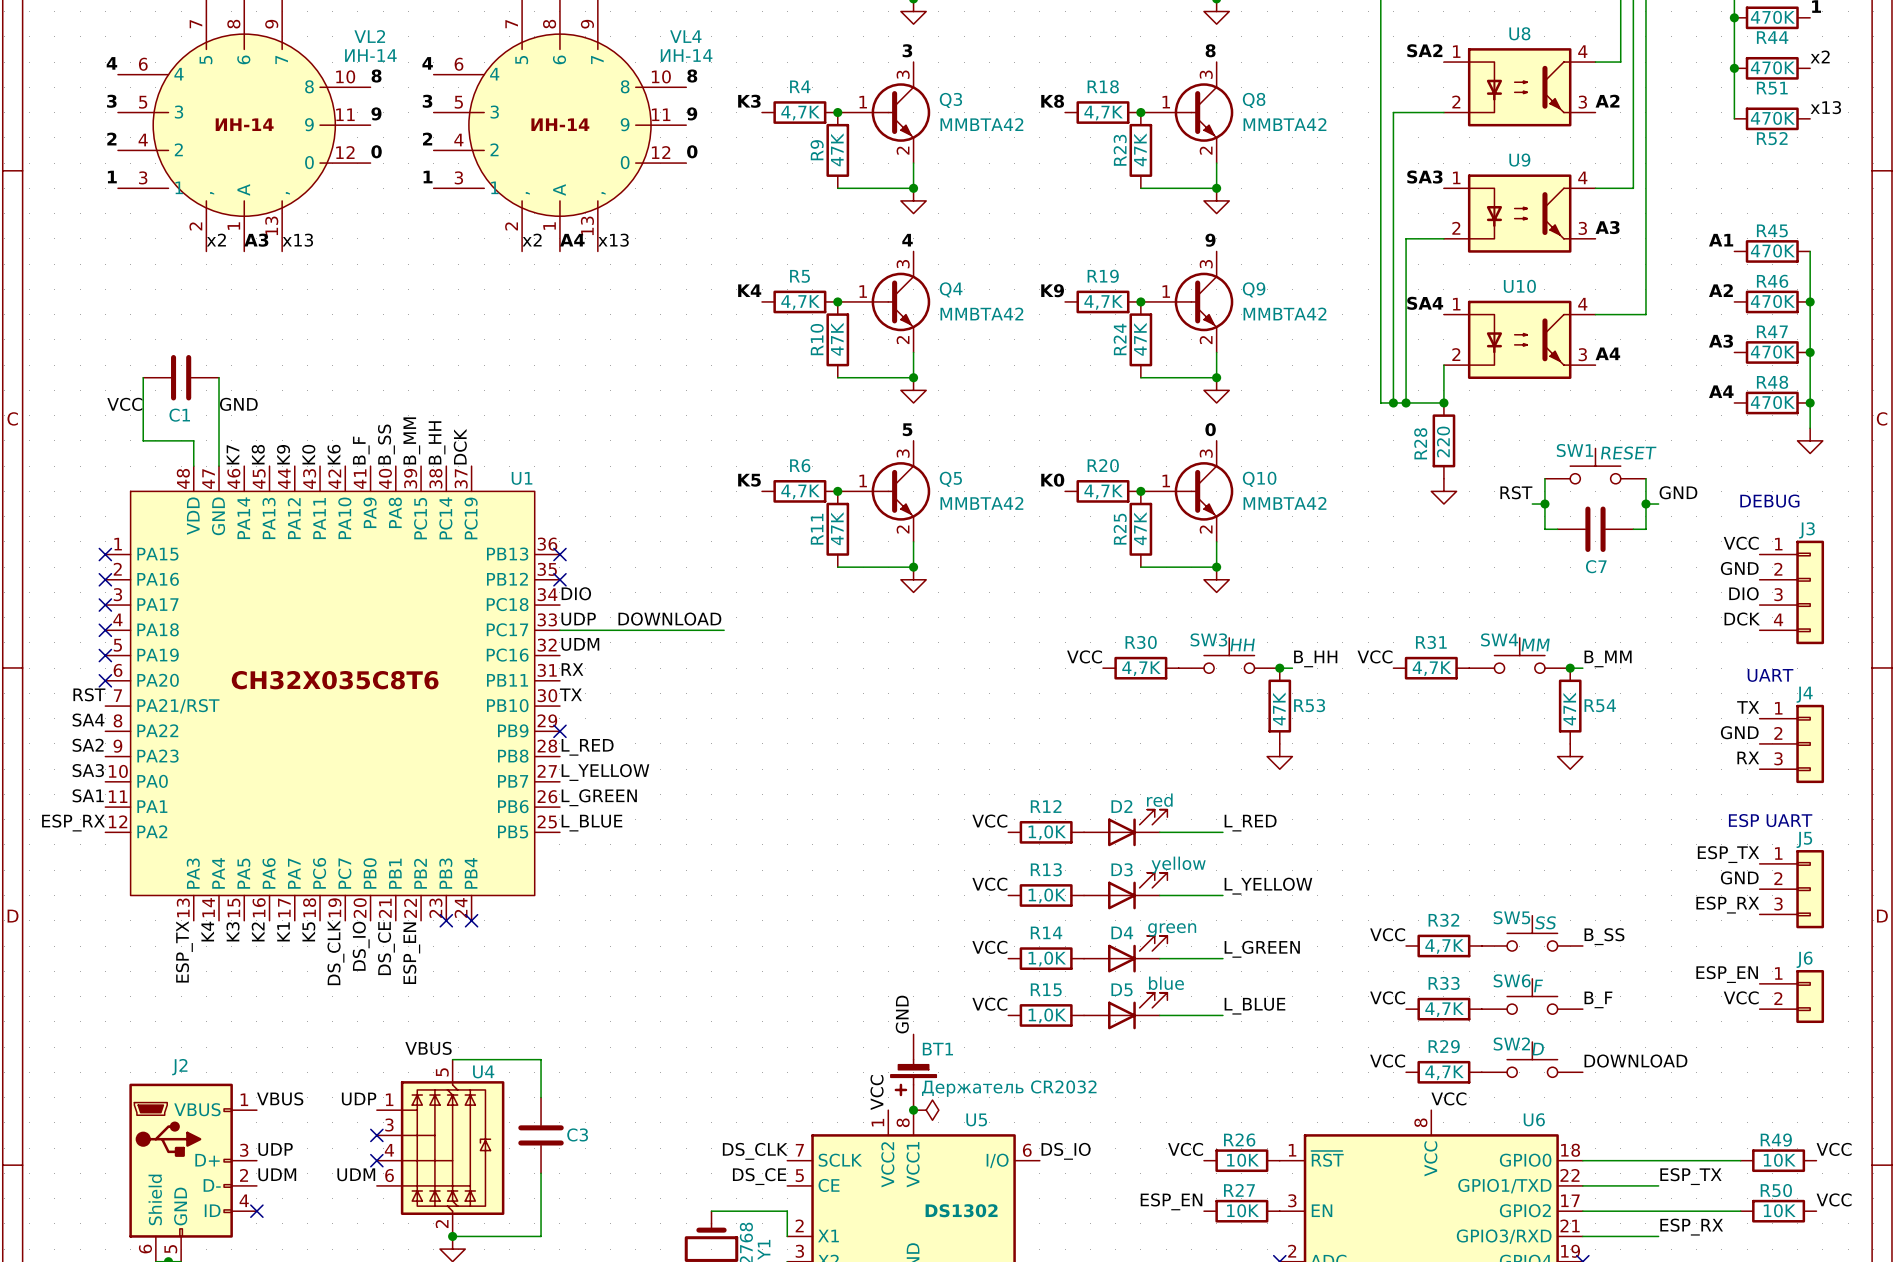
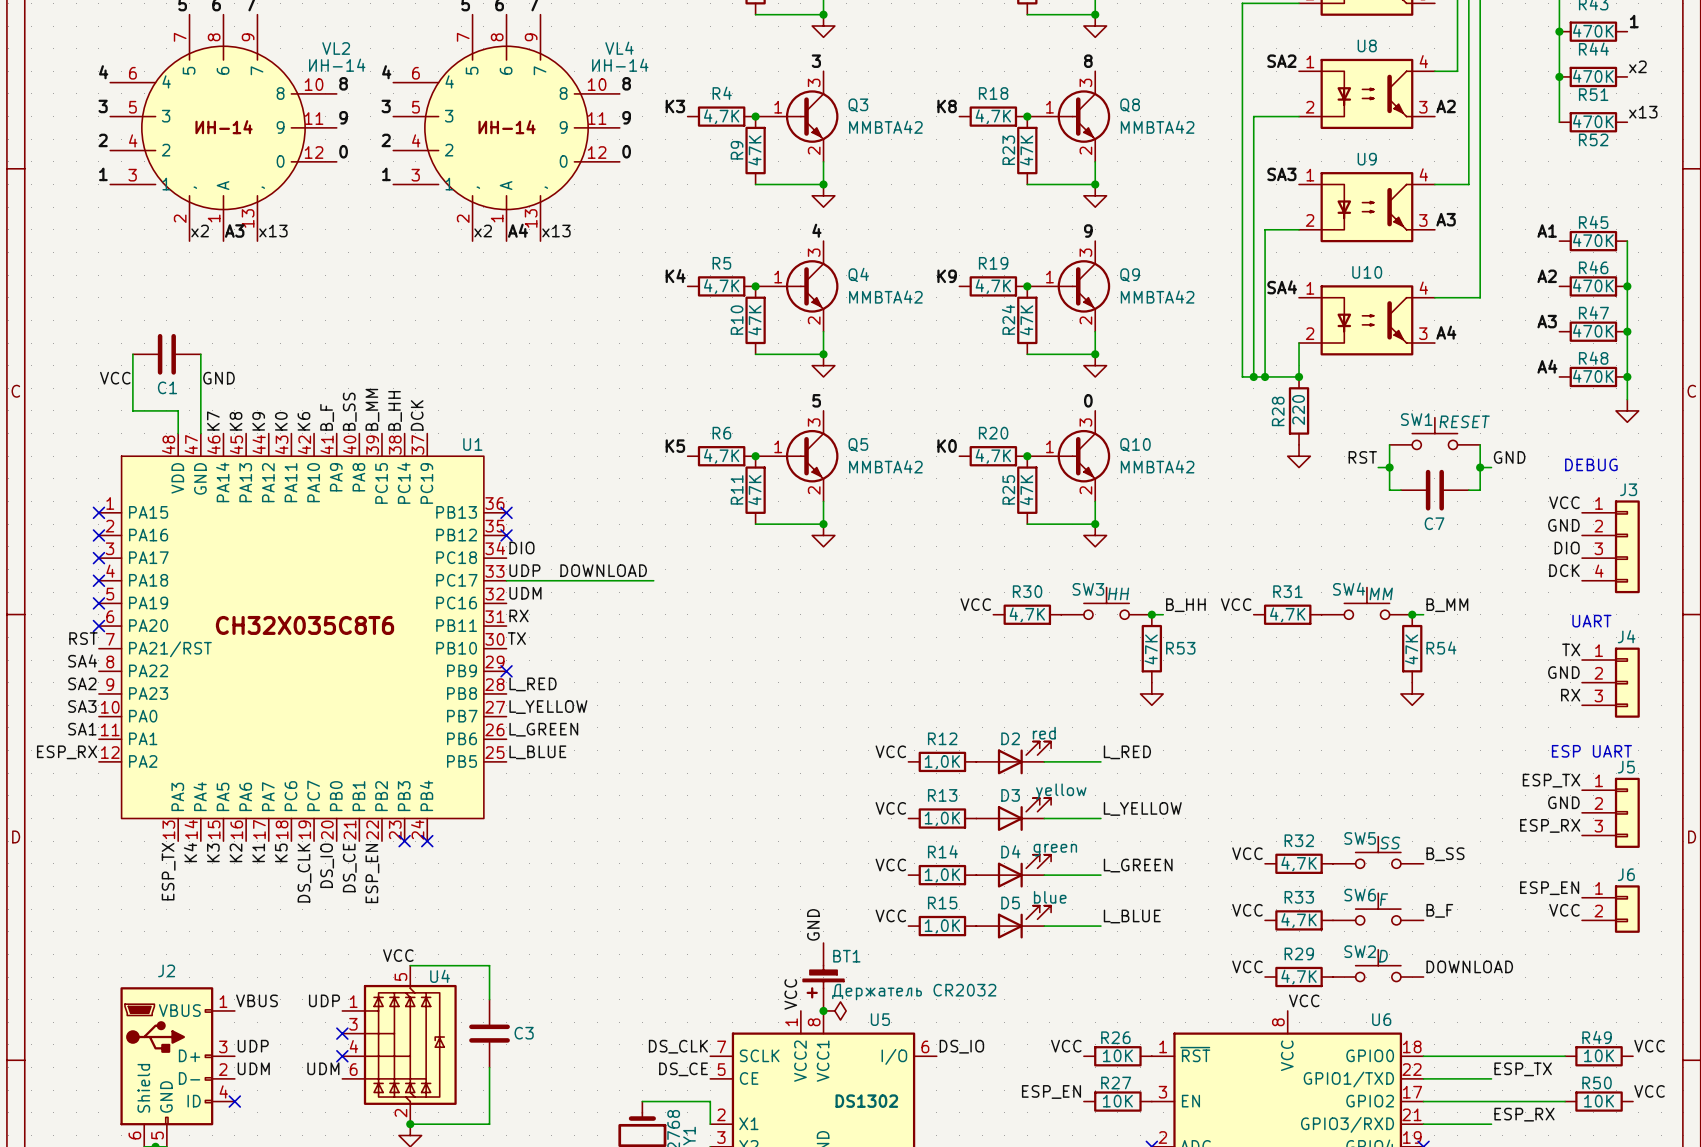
label: VBUS (428, 1048) -> VCC (398, 955)

